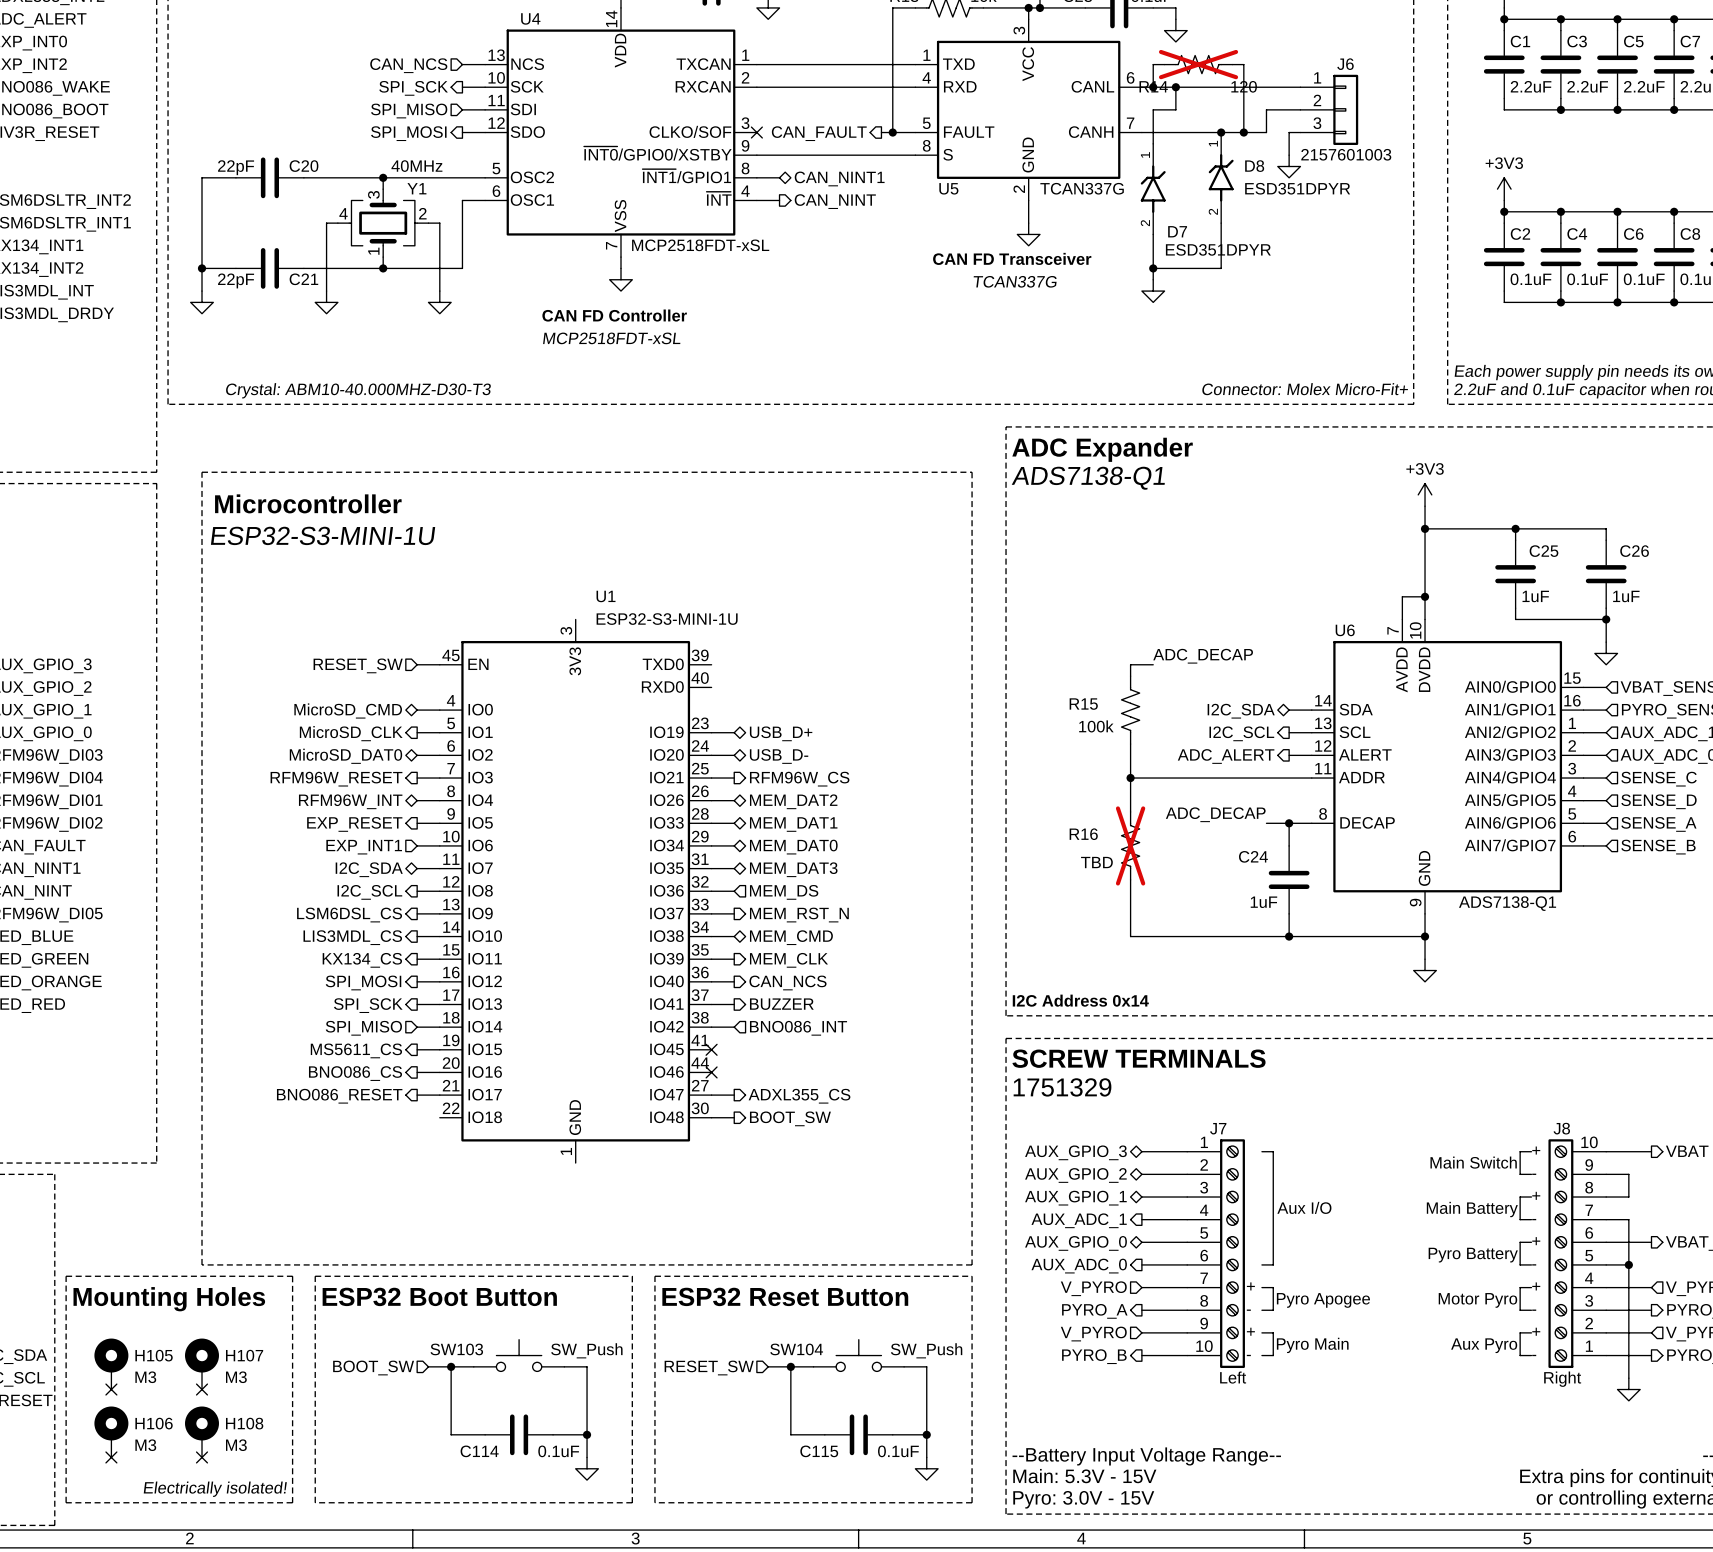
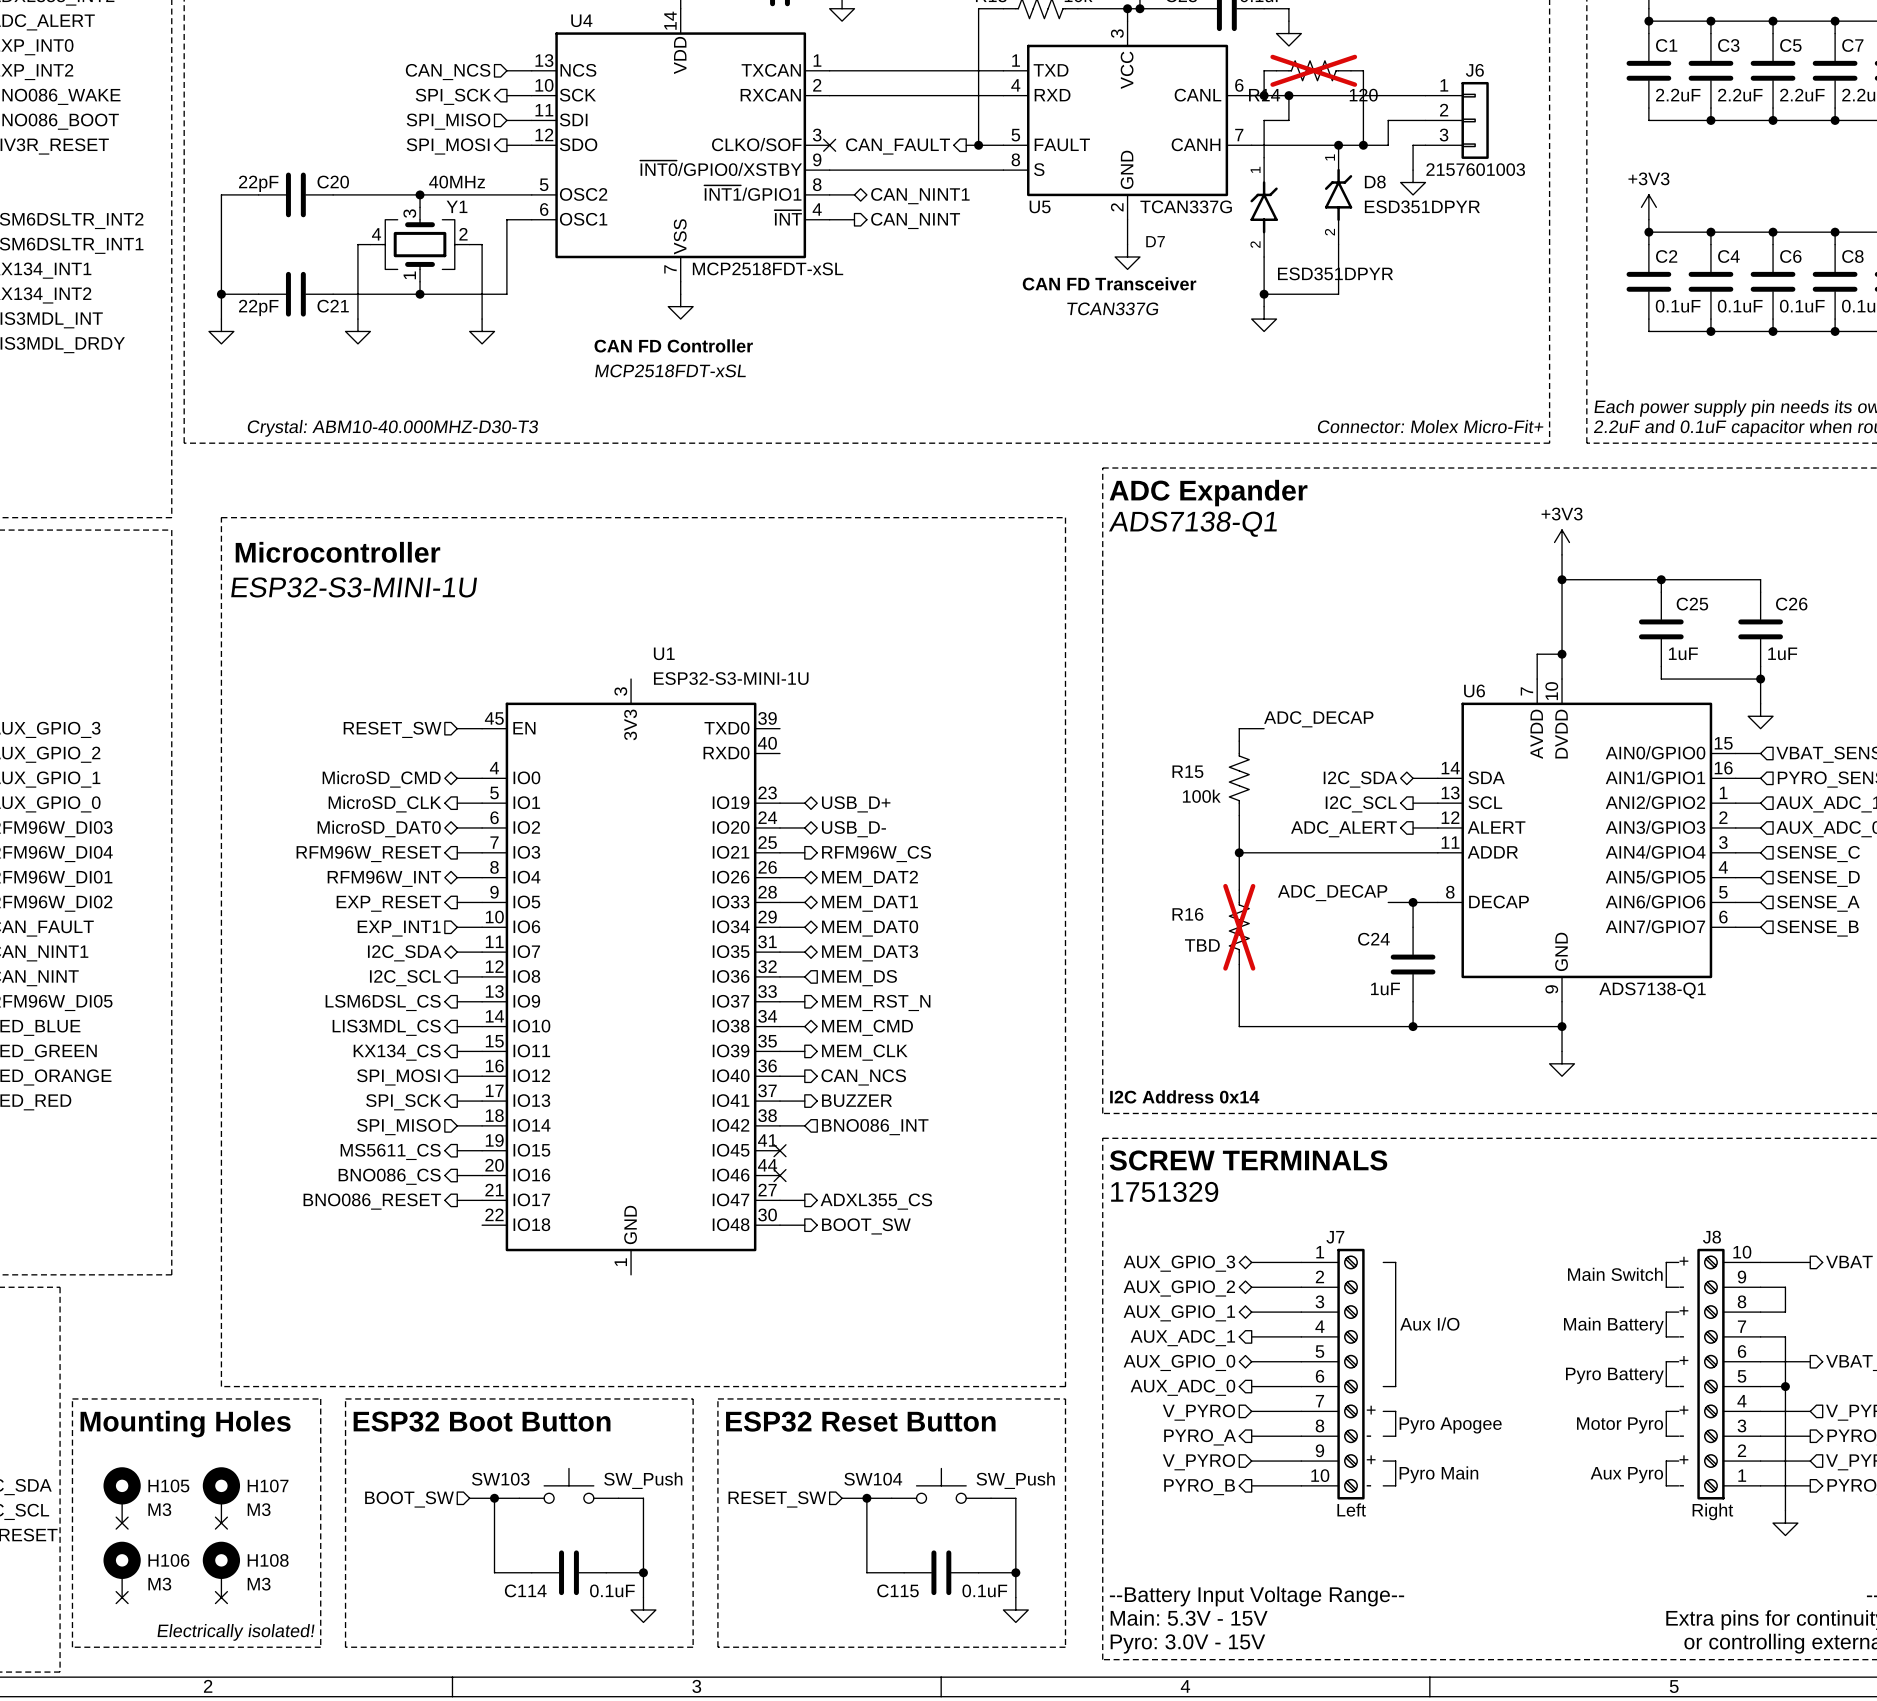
D7 name position: D7 (1177, 231) -> D7 (1155, 241)

